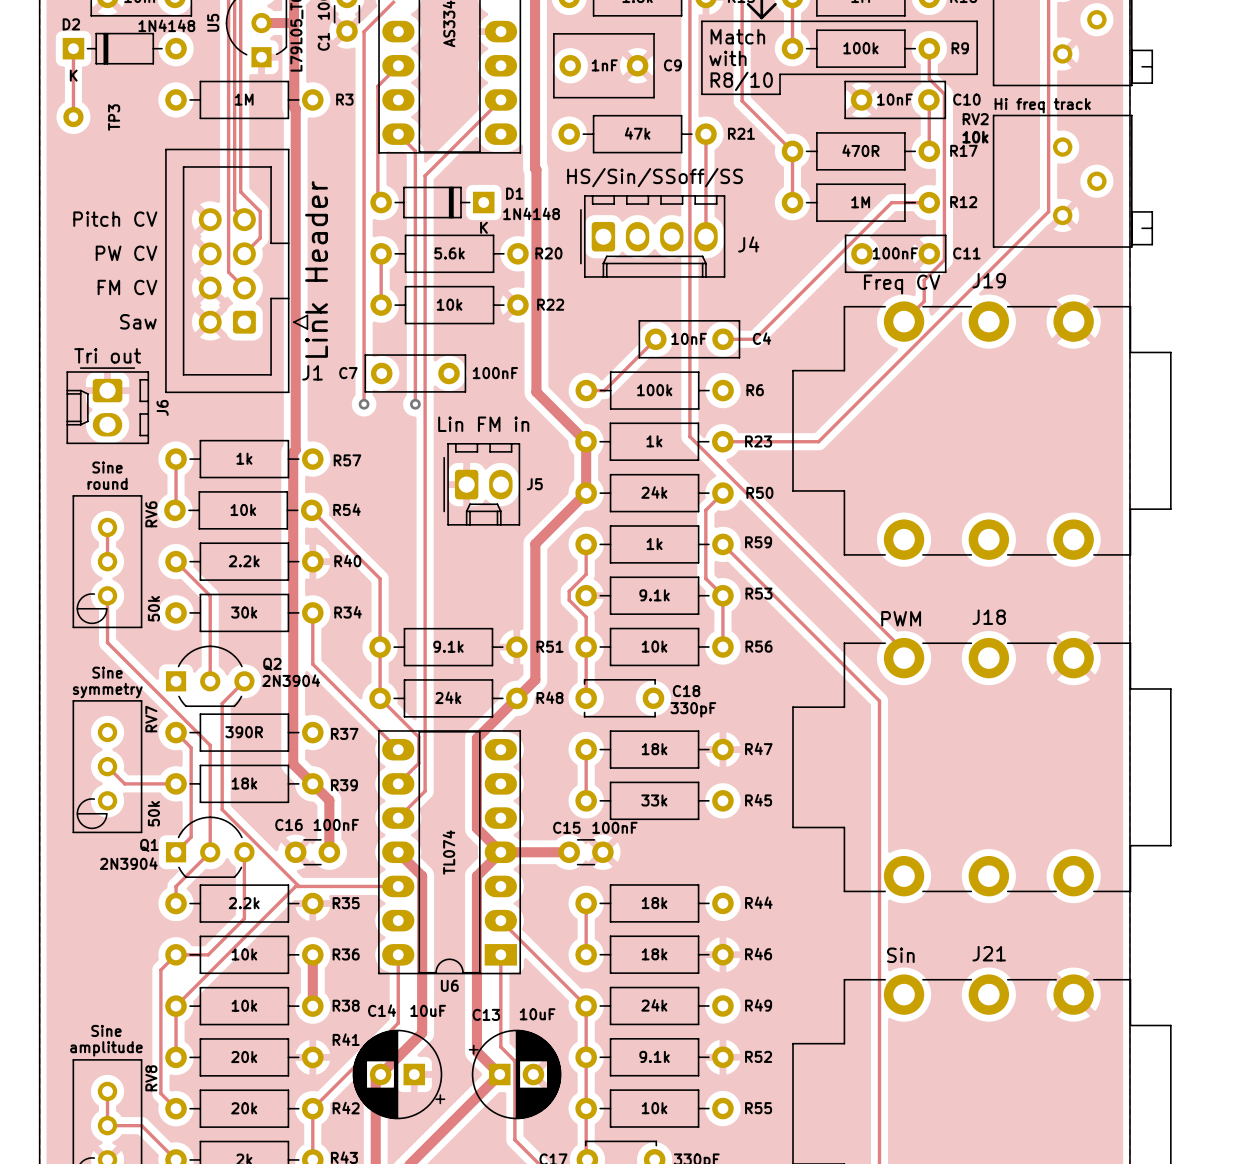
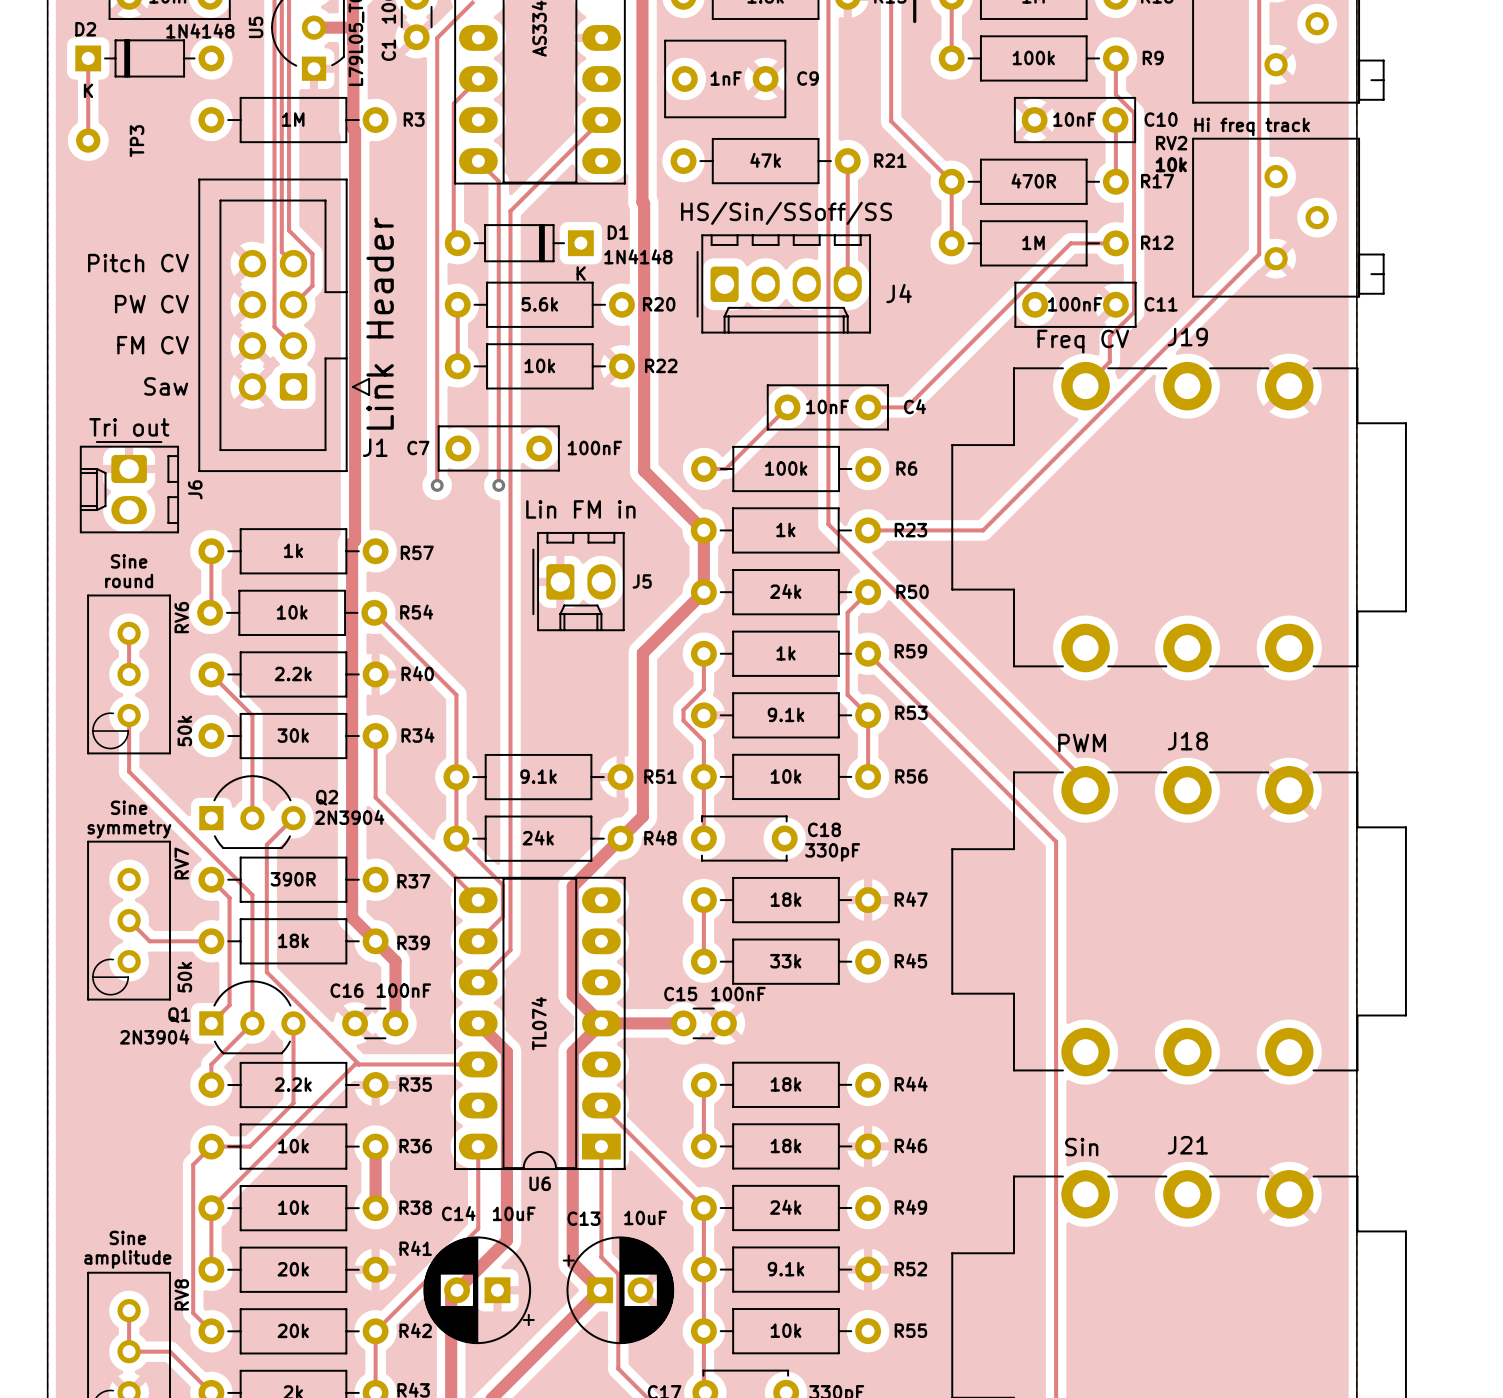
line: (748, 4) (761, 17) (775, 4) -> none
line: (701, 21) (701, 94) (780, 94) (780, 74) (977, 74) (977, 21) (701, 21) -> none
text: Match (737, 36) -> none
text: with (727, 58) -> none
text: R8/10 (741, 81) -> none

